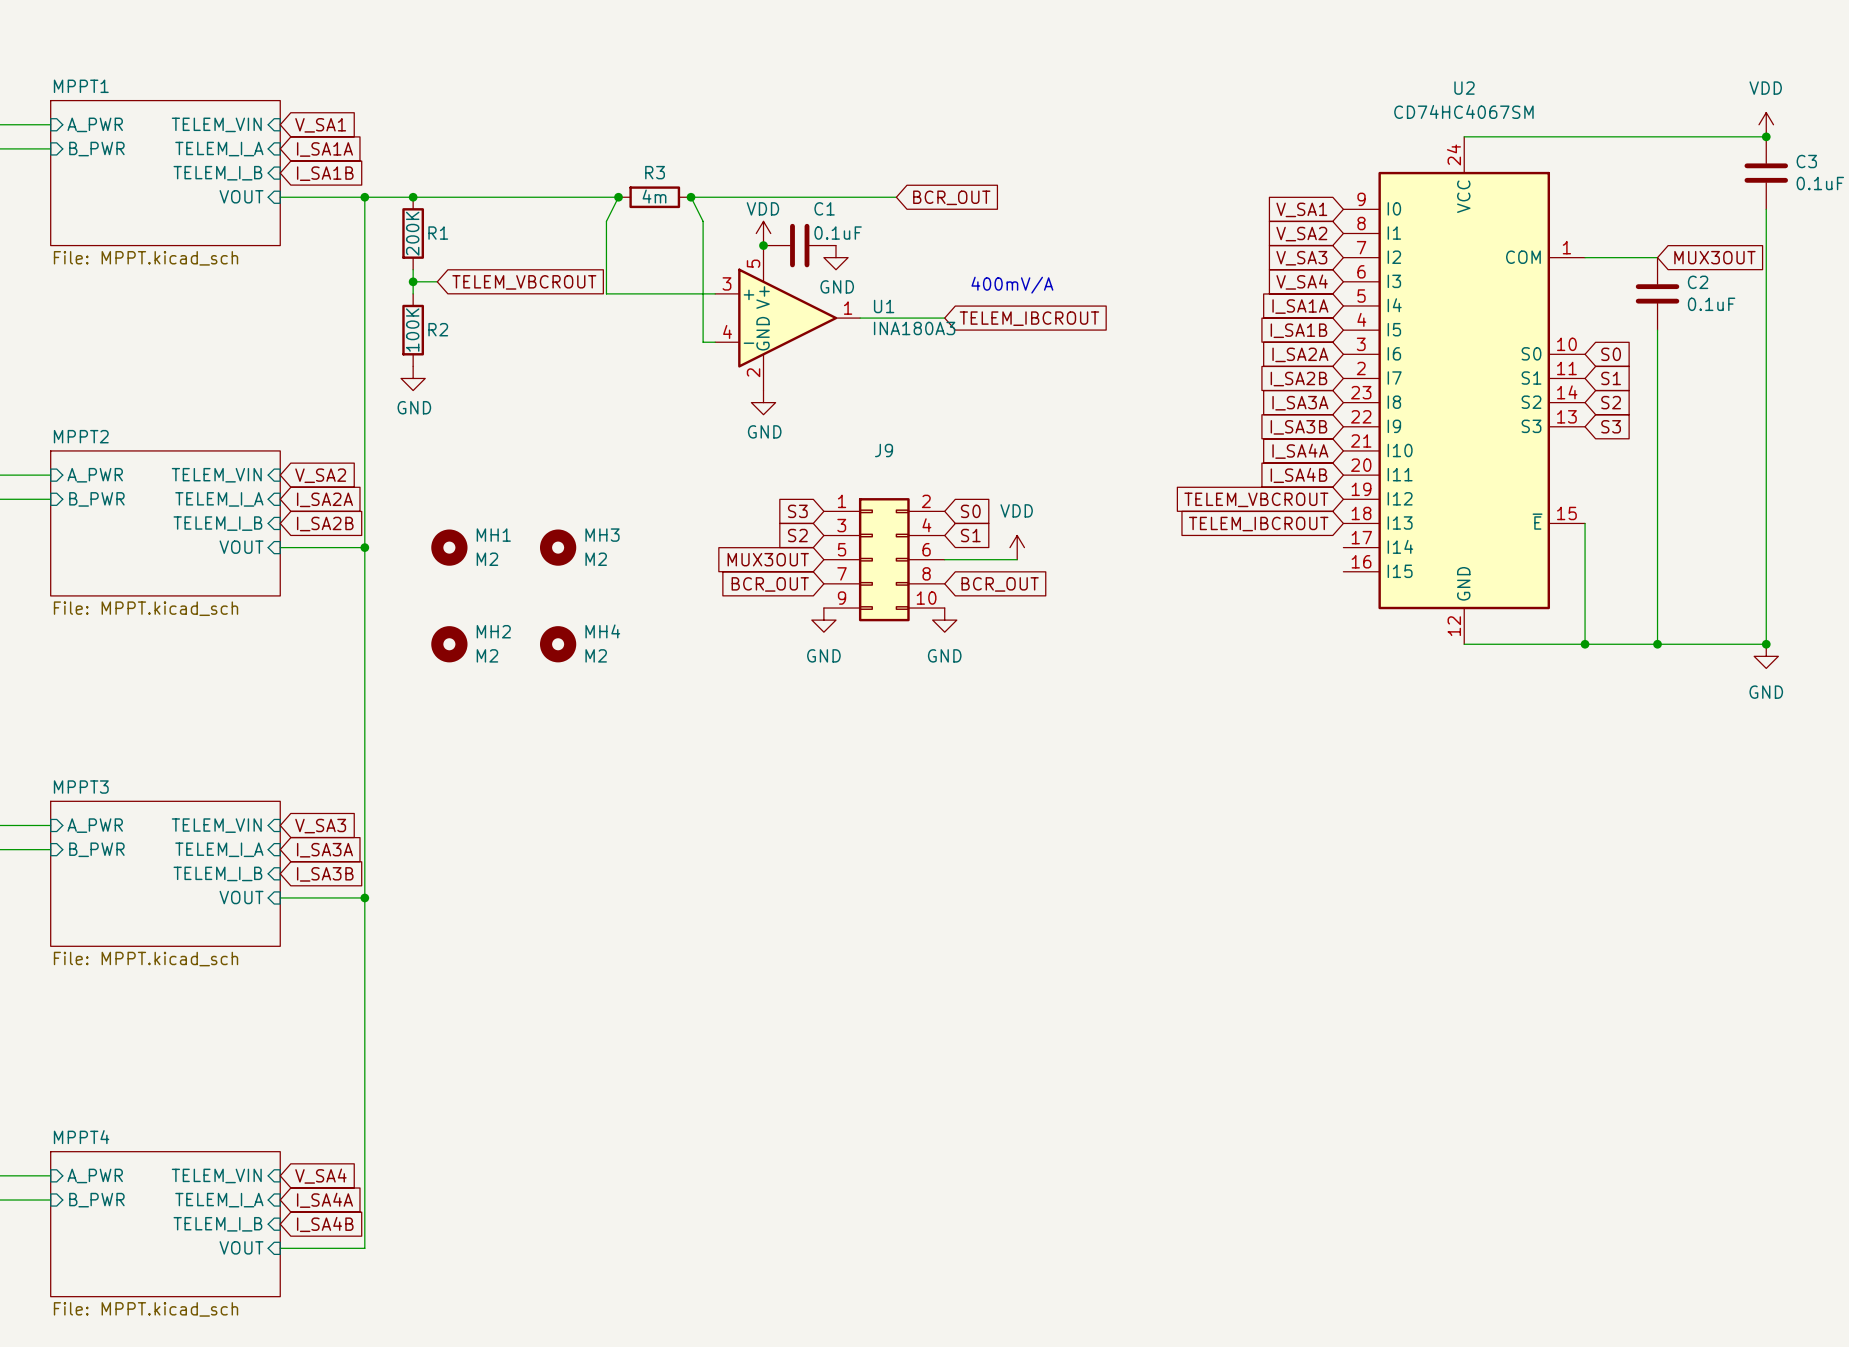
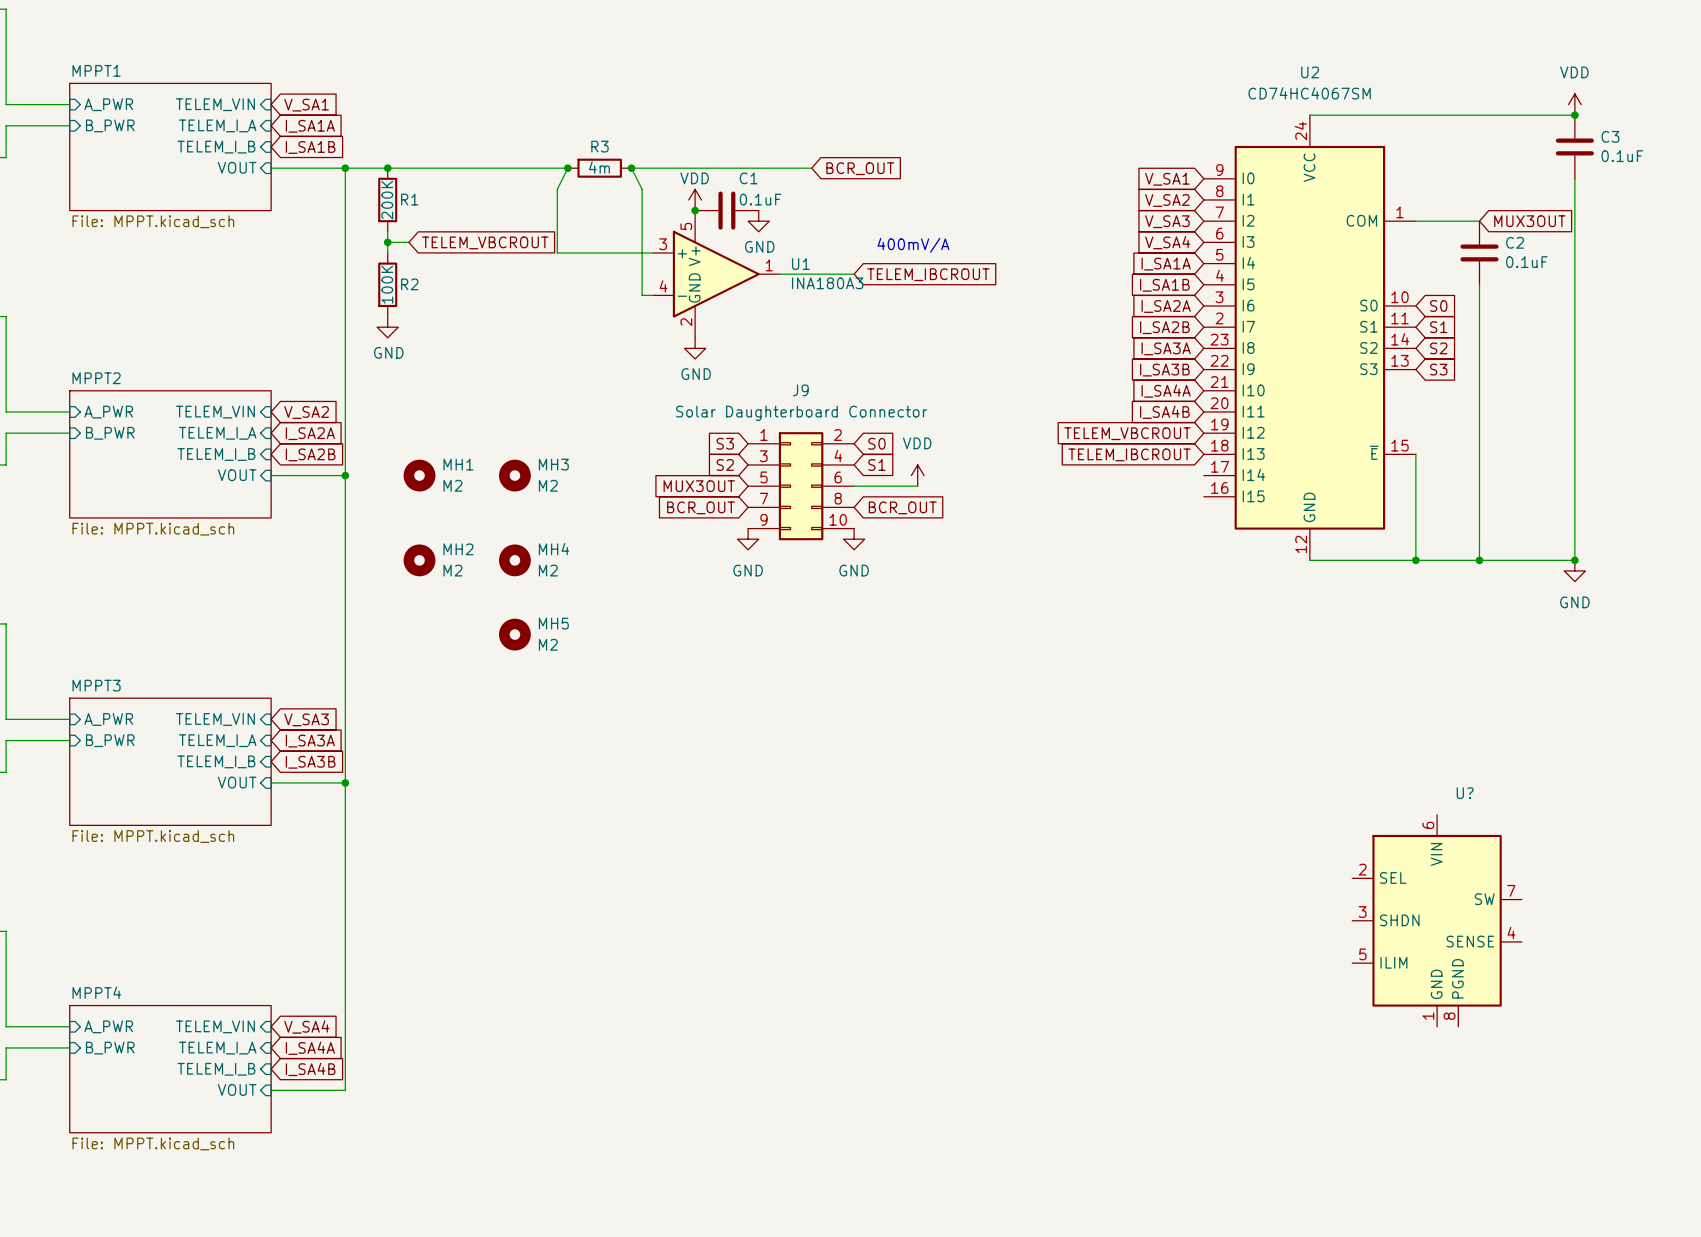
J9 value: none -> Solar Daughterboard Connector (801, 413)
MH5: none -> M2 (514, 634)
U?: none -> (1437, 920)

